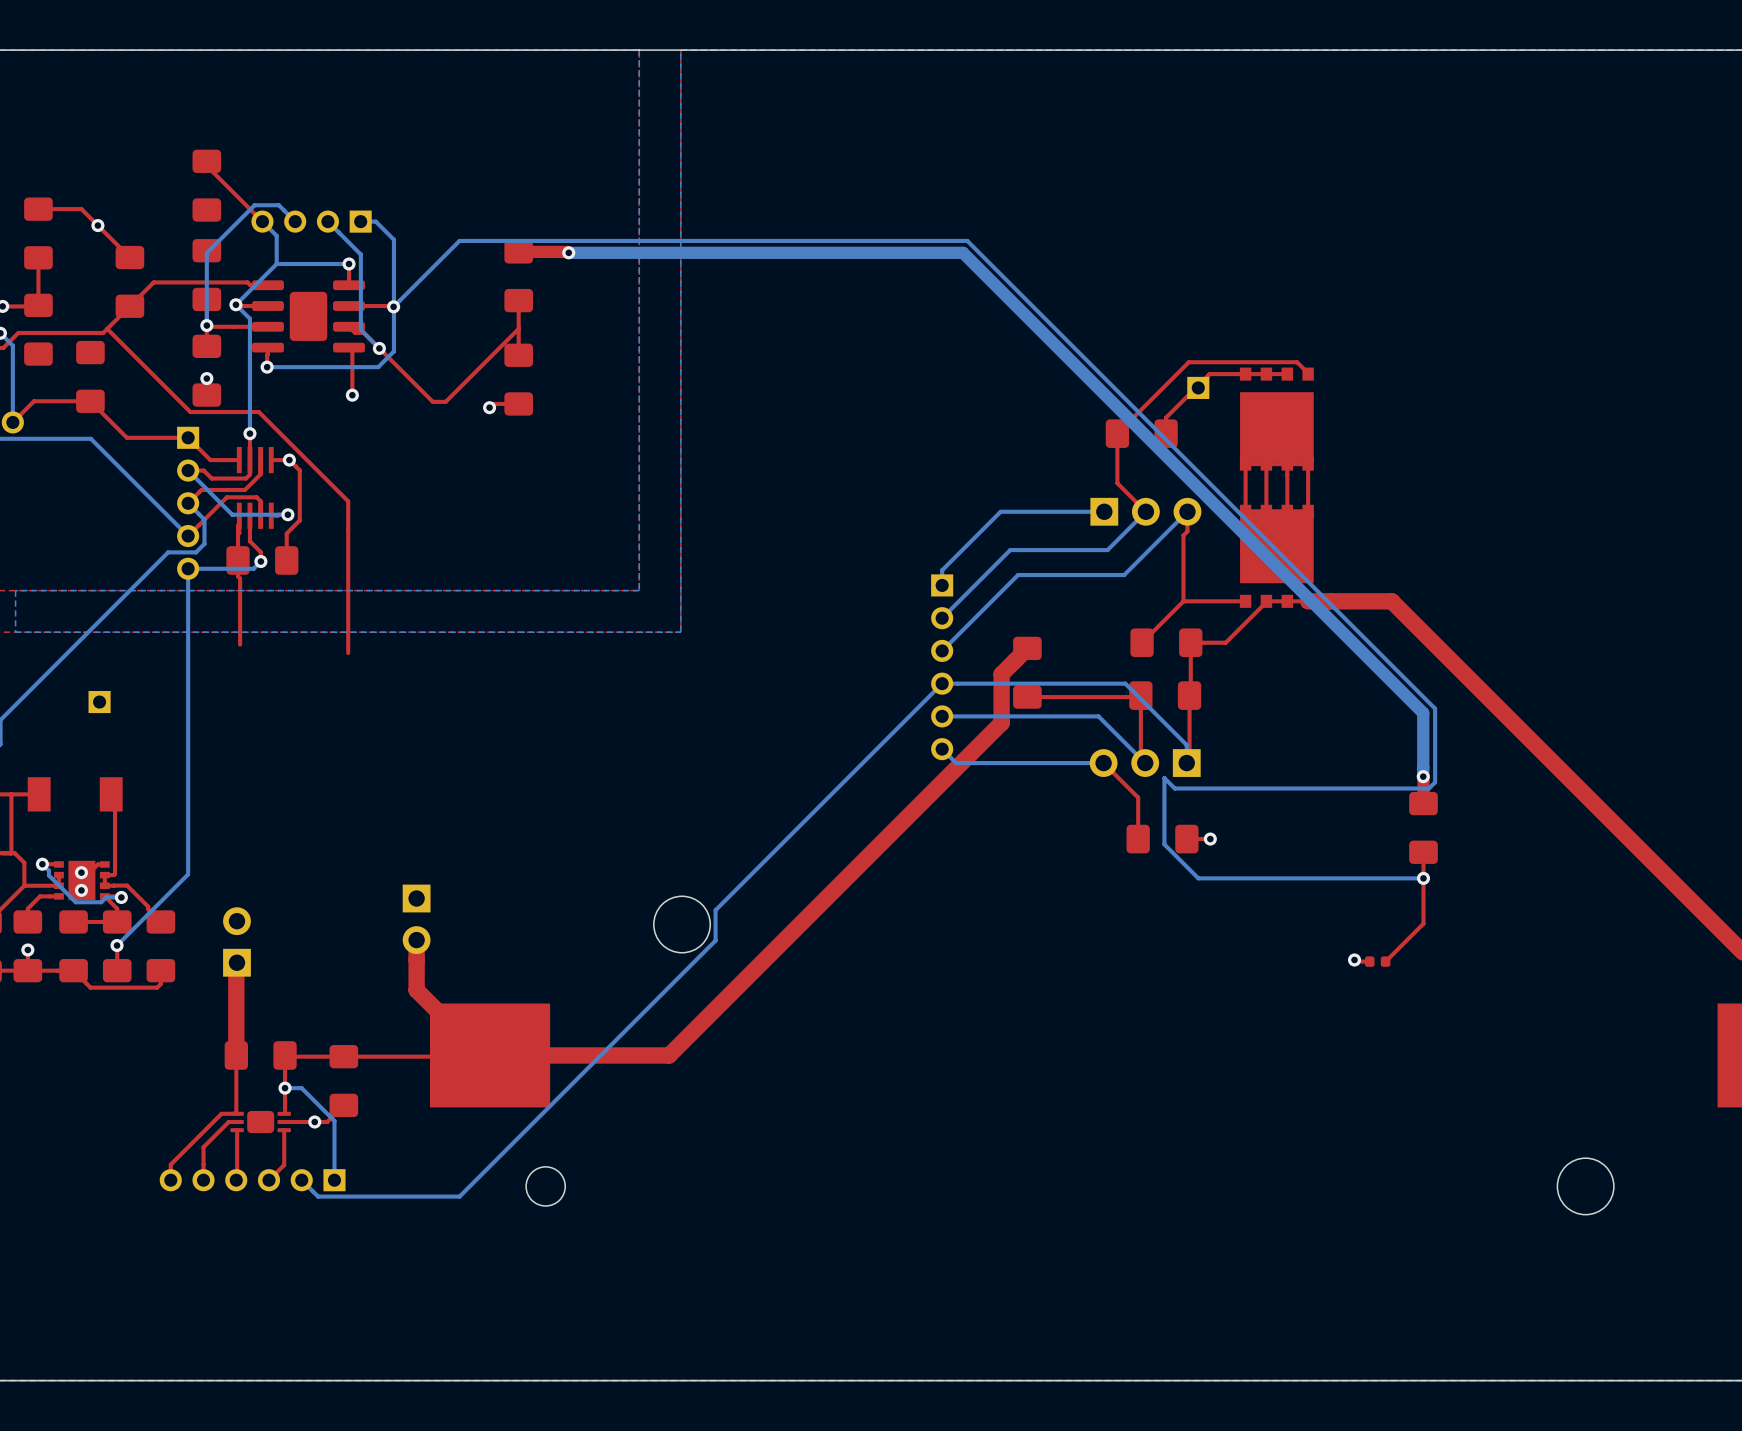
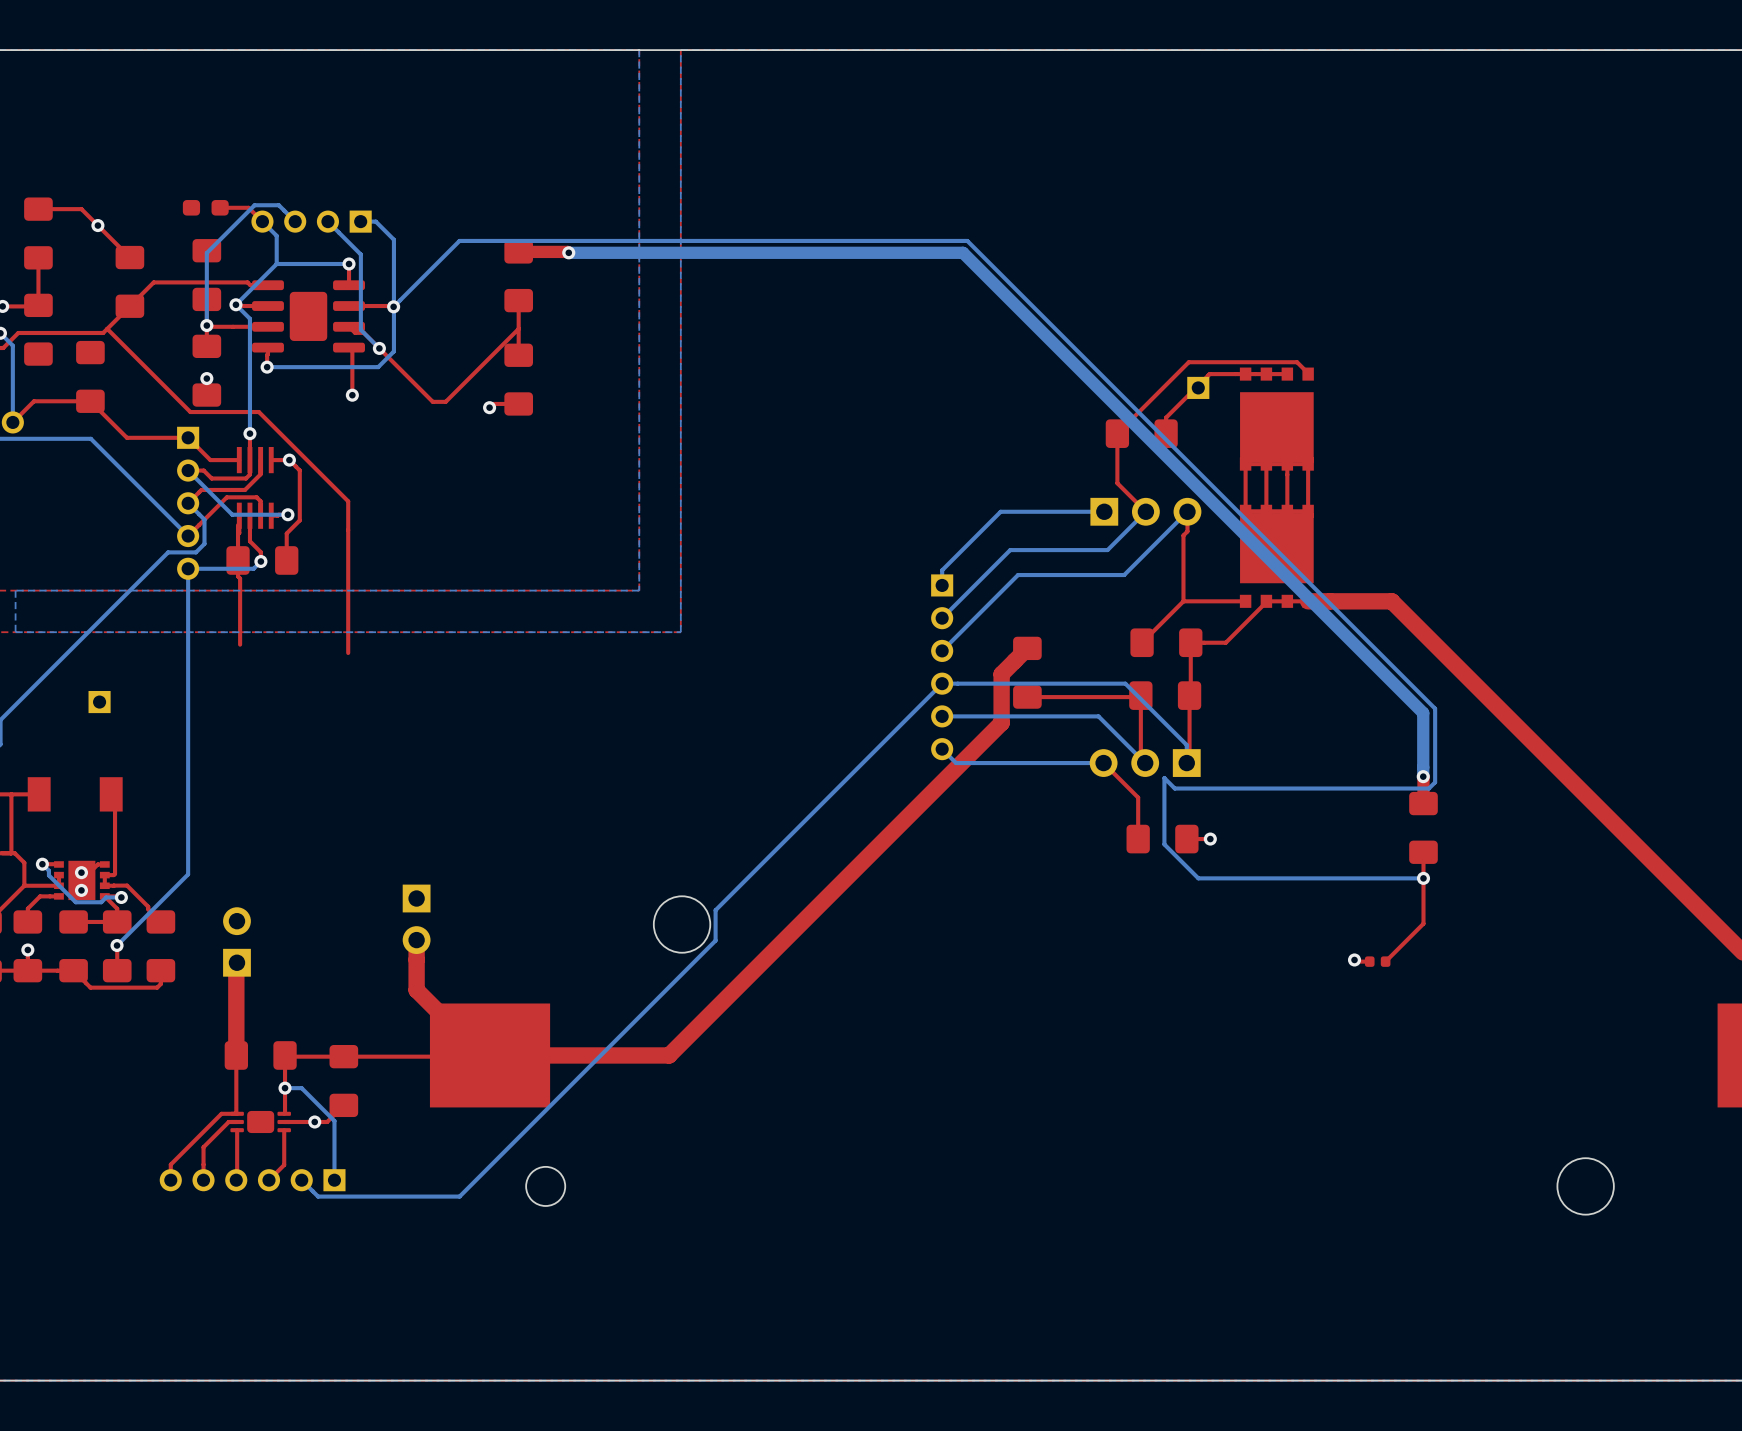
top track: (206, 161) (206, 165) (248, 207) -> (220, 207) (248, 207)
part: (206, 185) -> none
part: none -> (205, 207)

